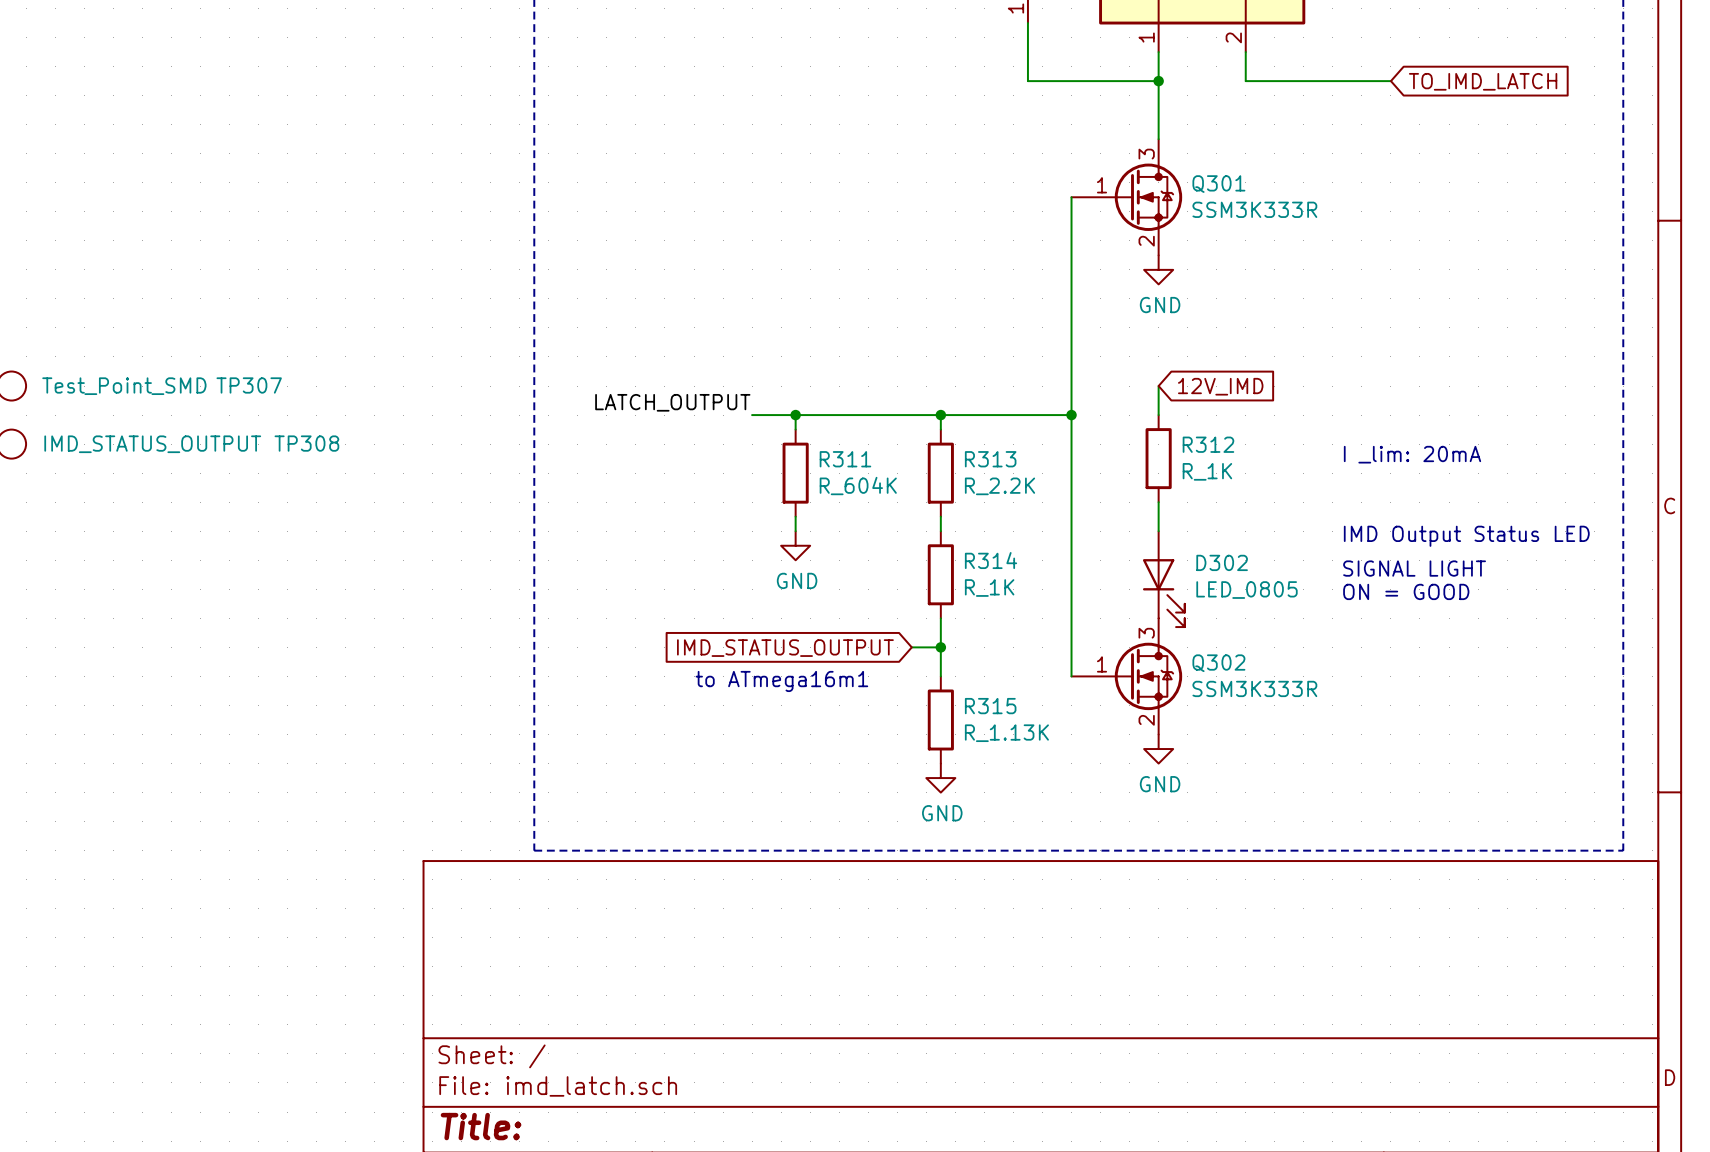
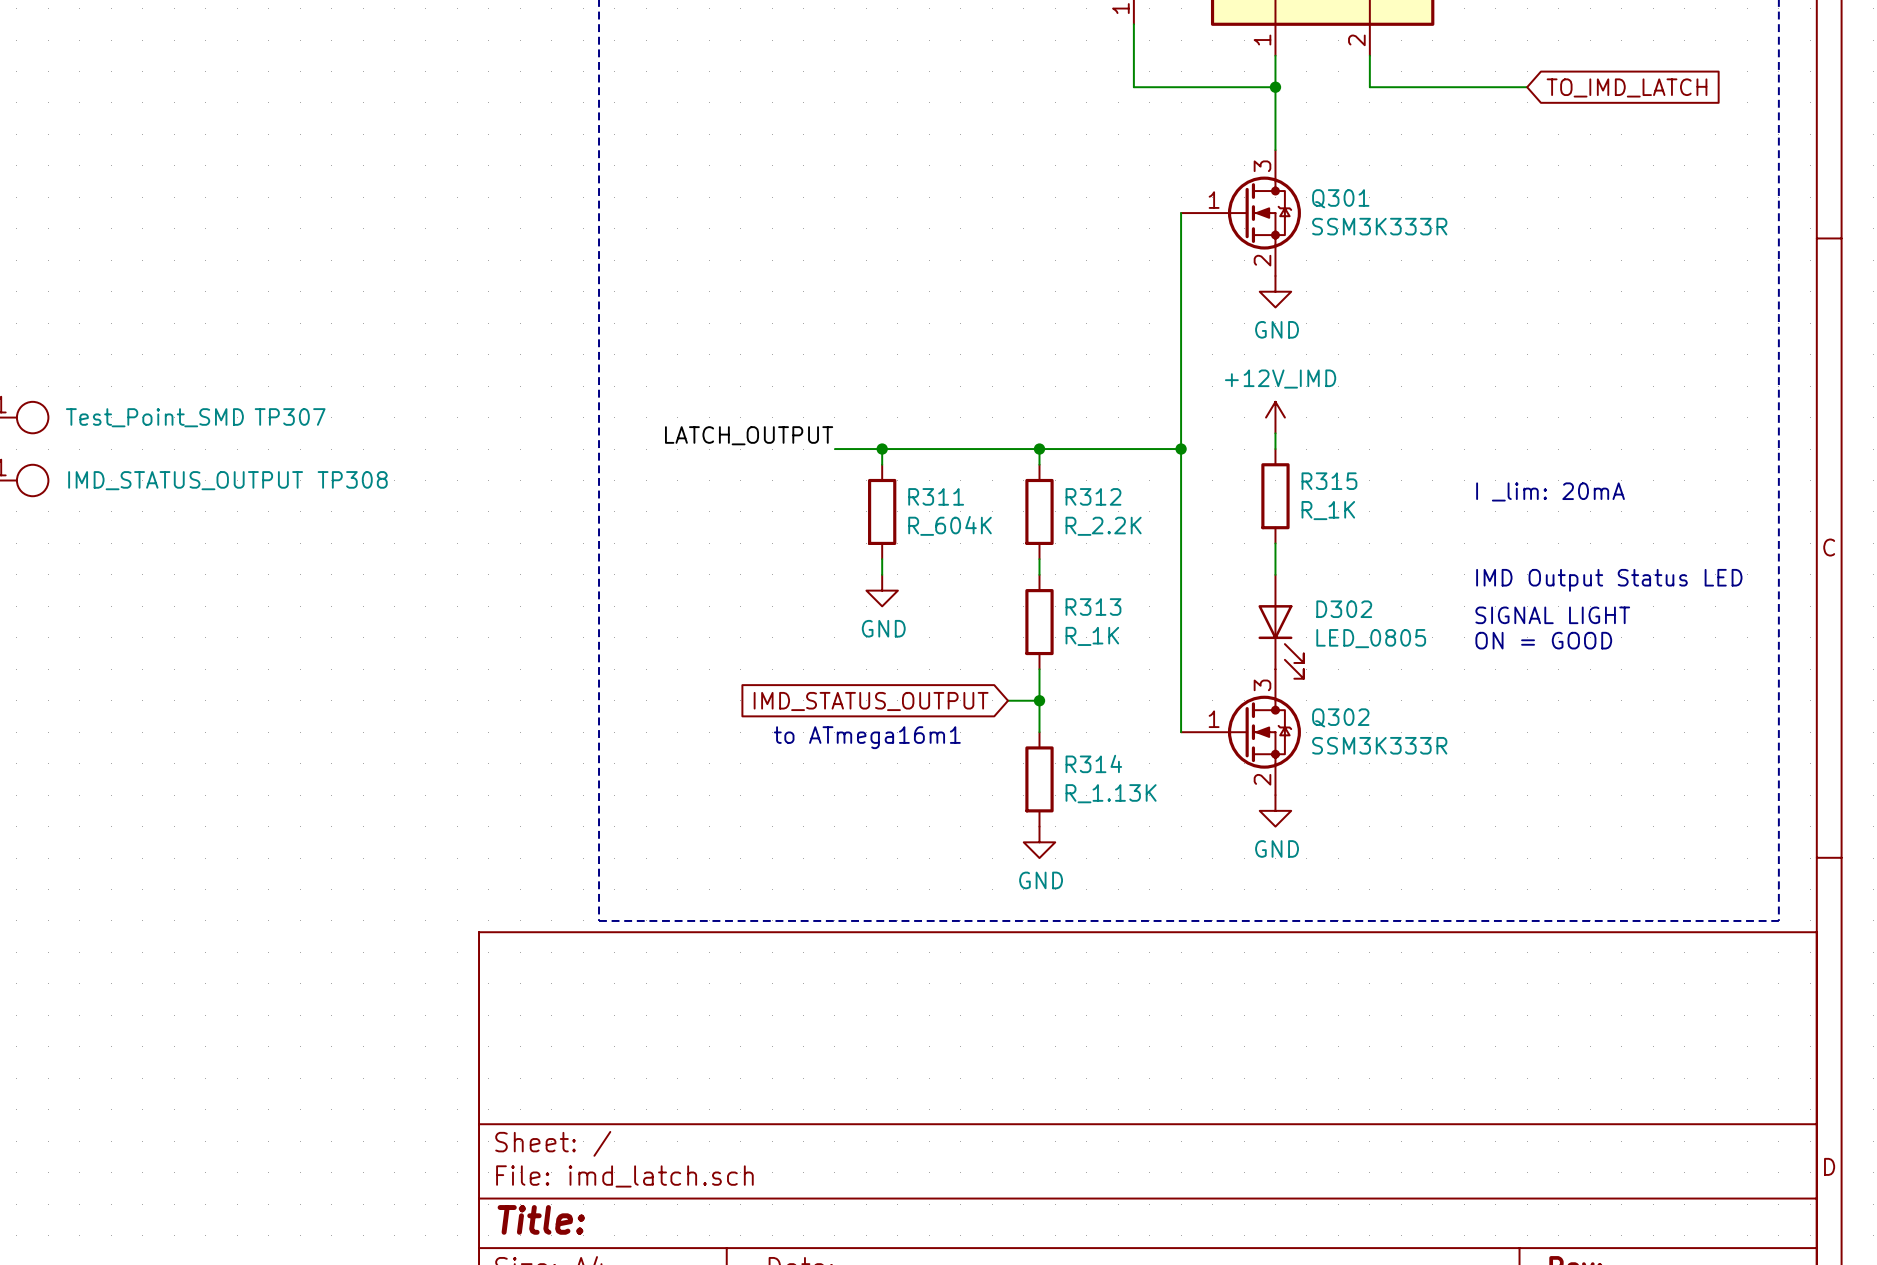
power symbol: none -> +12V_IMD (1275, 417)
global label: 12V_IMD (1220, 386) -> none
R312 name: R312 (1208, 444) -> R315 (1329, 481)
R313 name: R313 (990, 459) -> R312 (1093, 496)
R314 name: R314 (991, 560) -> R313 (1093, 607)
R315 name: R315 (990, 706) -> R314 (1093, 763)

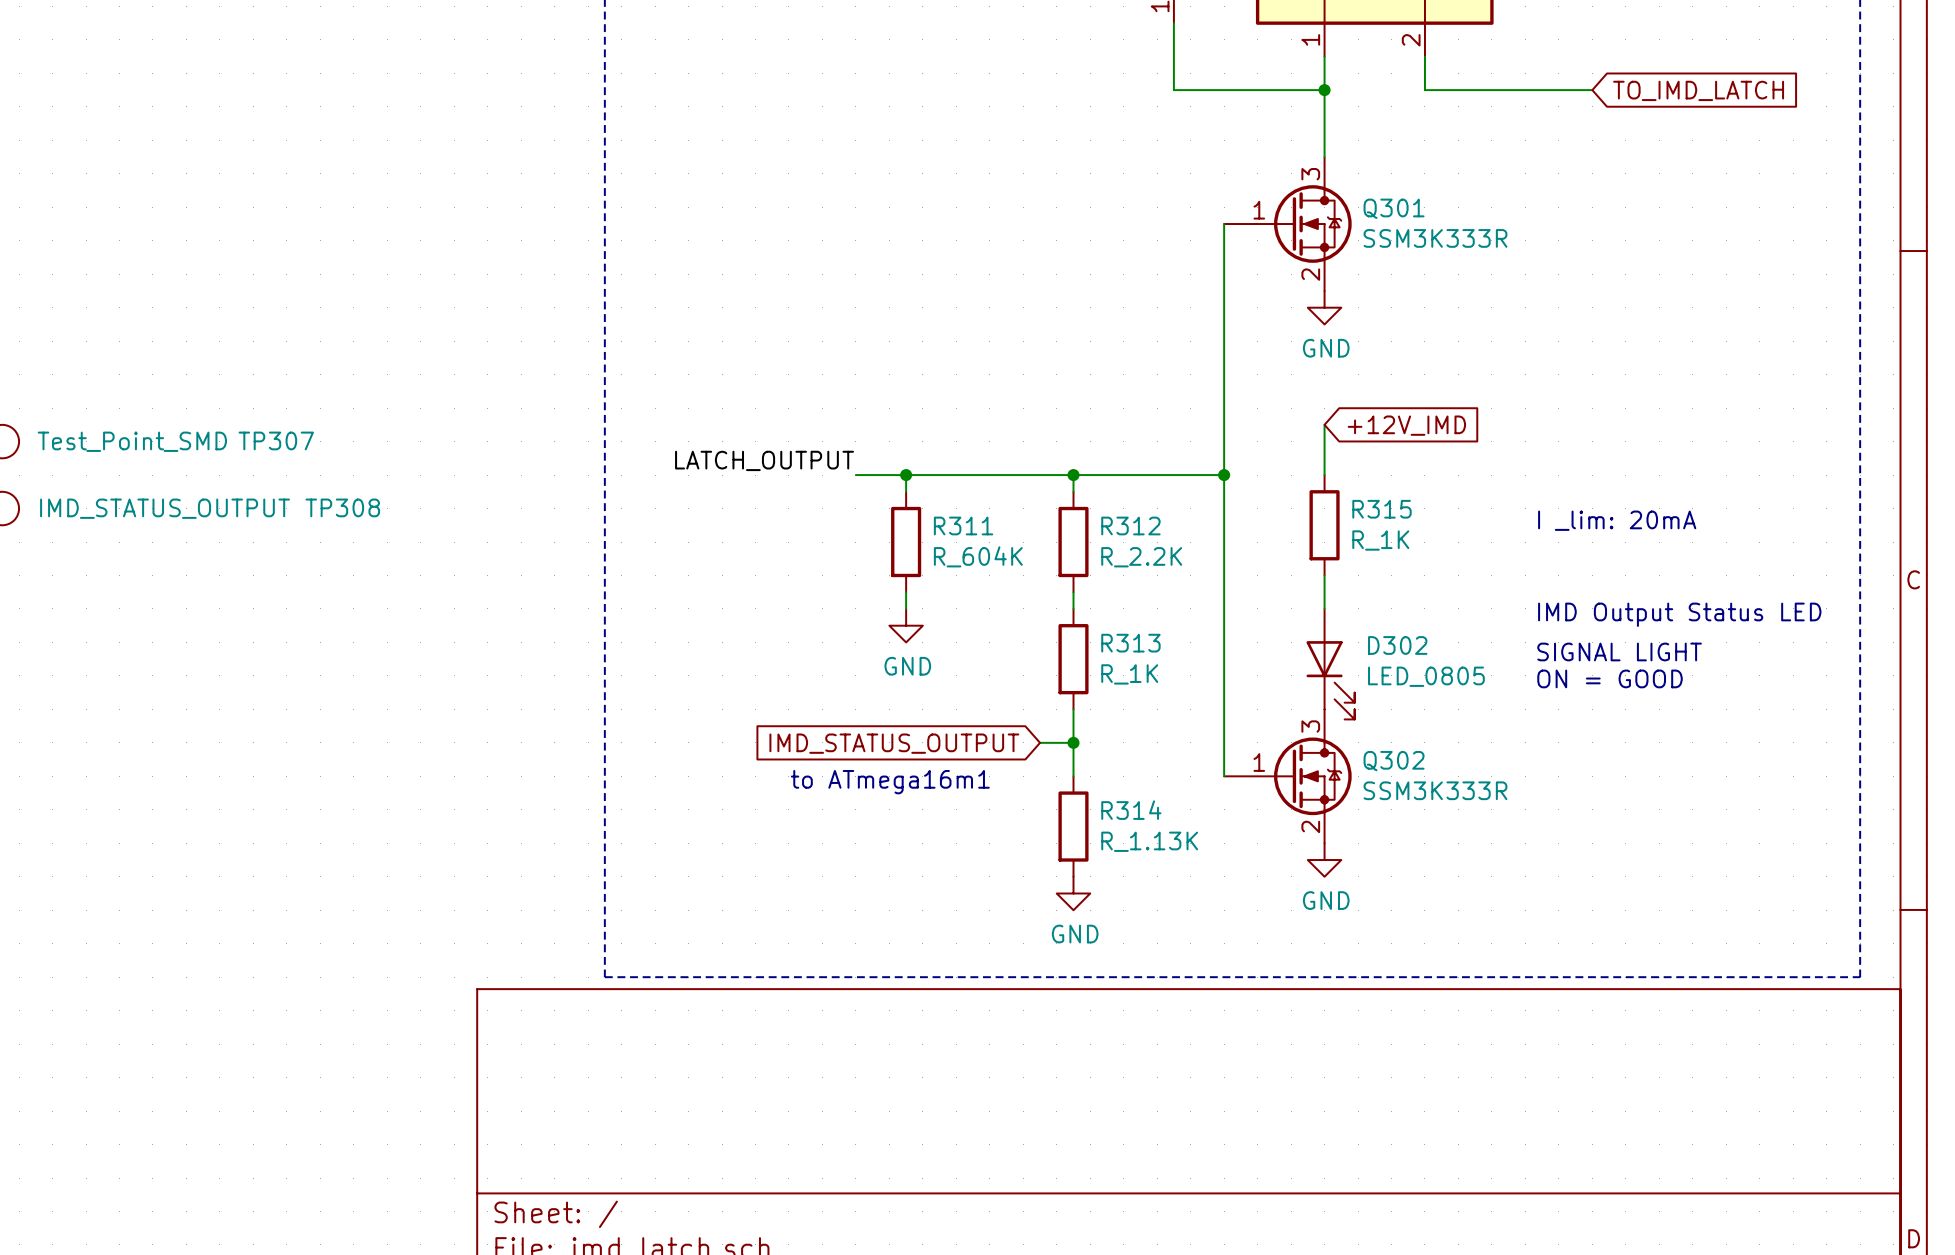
global label: none -> +12V_IMD (1406, 425)
power symbol: +12V_IMD (1275, 417) -> none

